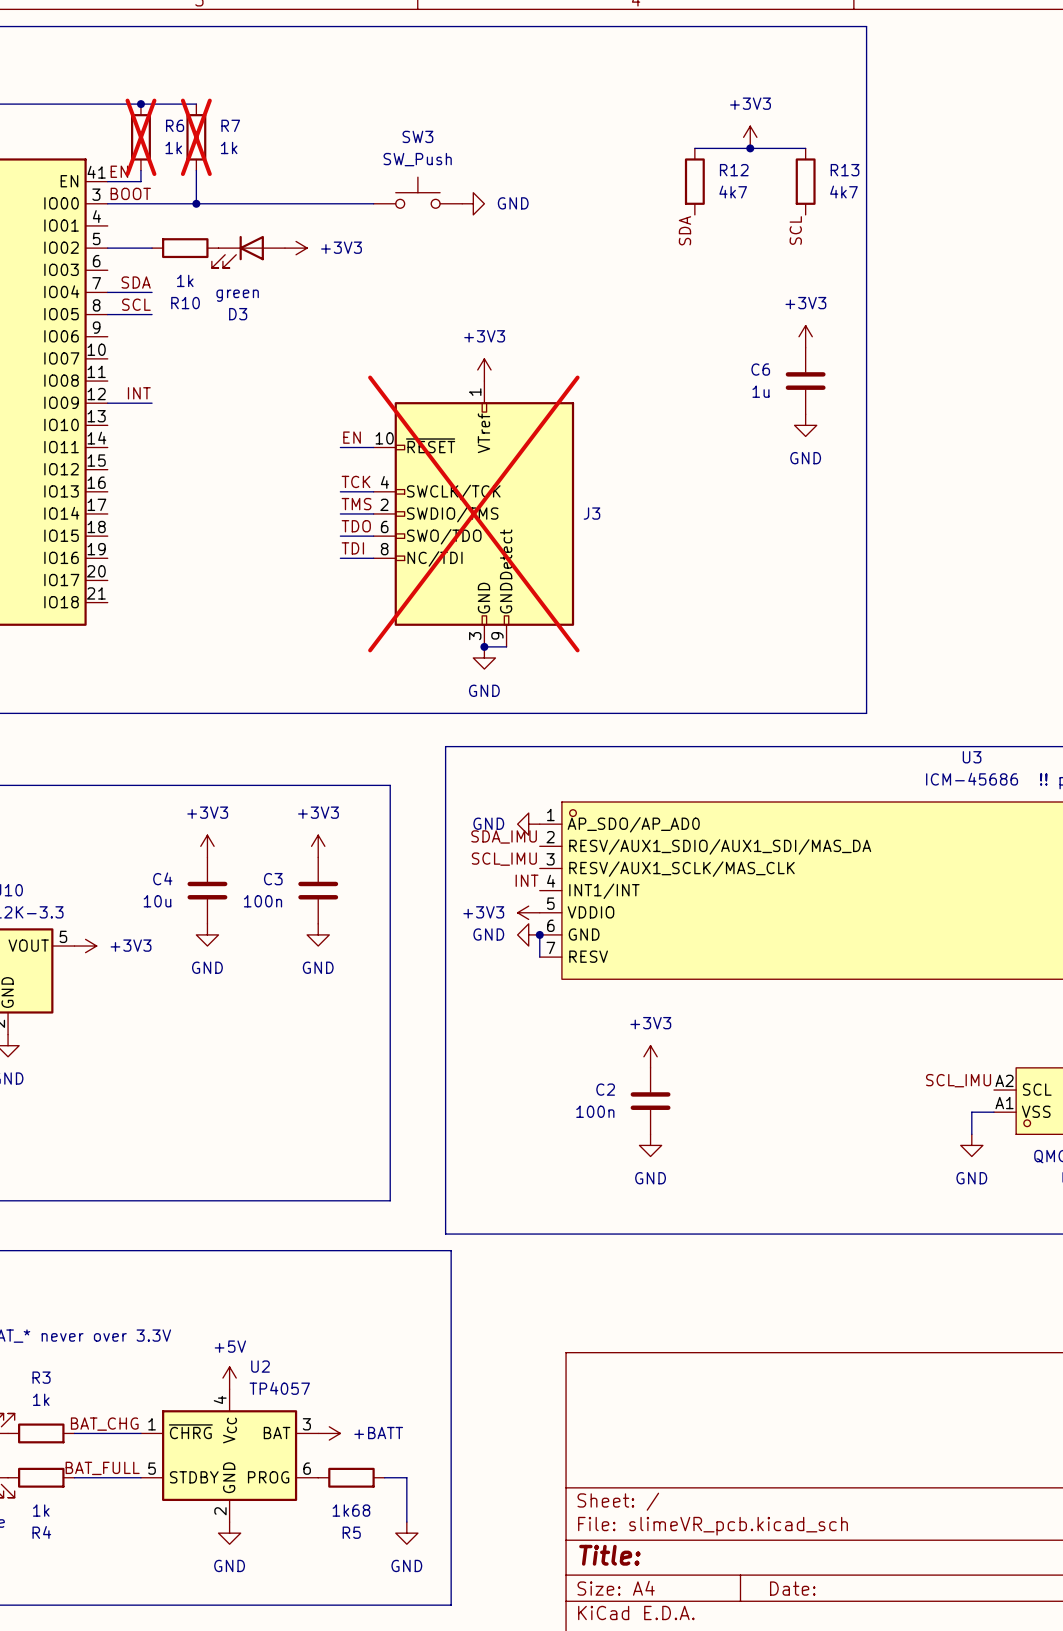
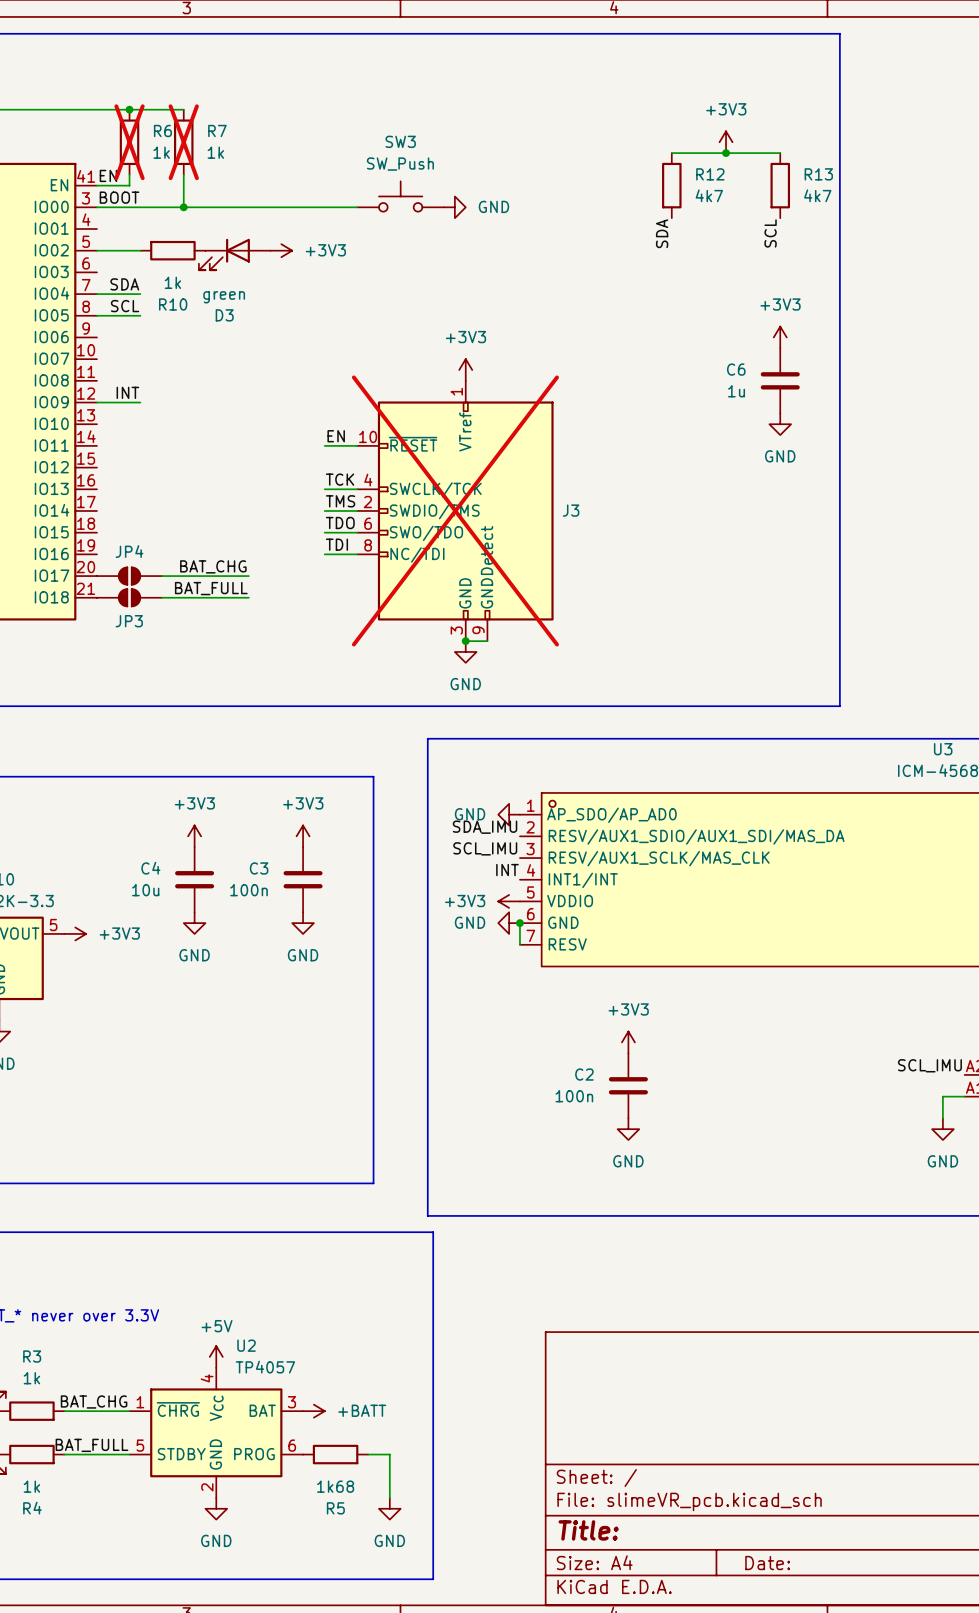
label: none -> BAT_CHG (213, 566)
JP4: none -> (129, 576)
wire: none -> (162, 576) (248, 576)
label: none -> BAT_FULL (211, 588)
JP3: none -> (129, 597)
wire: none -> (162, 597) (248, 597)

